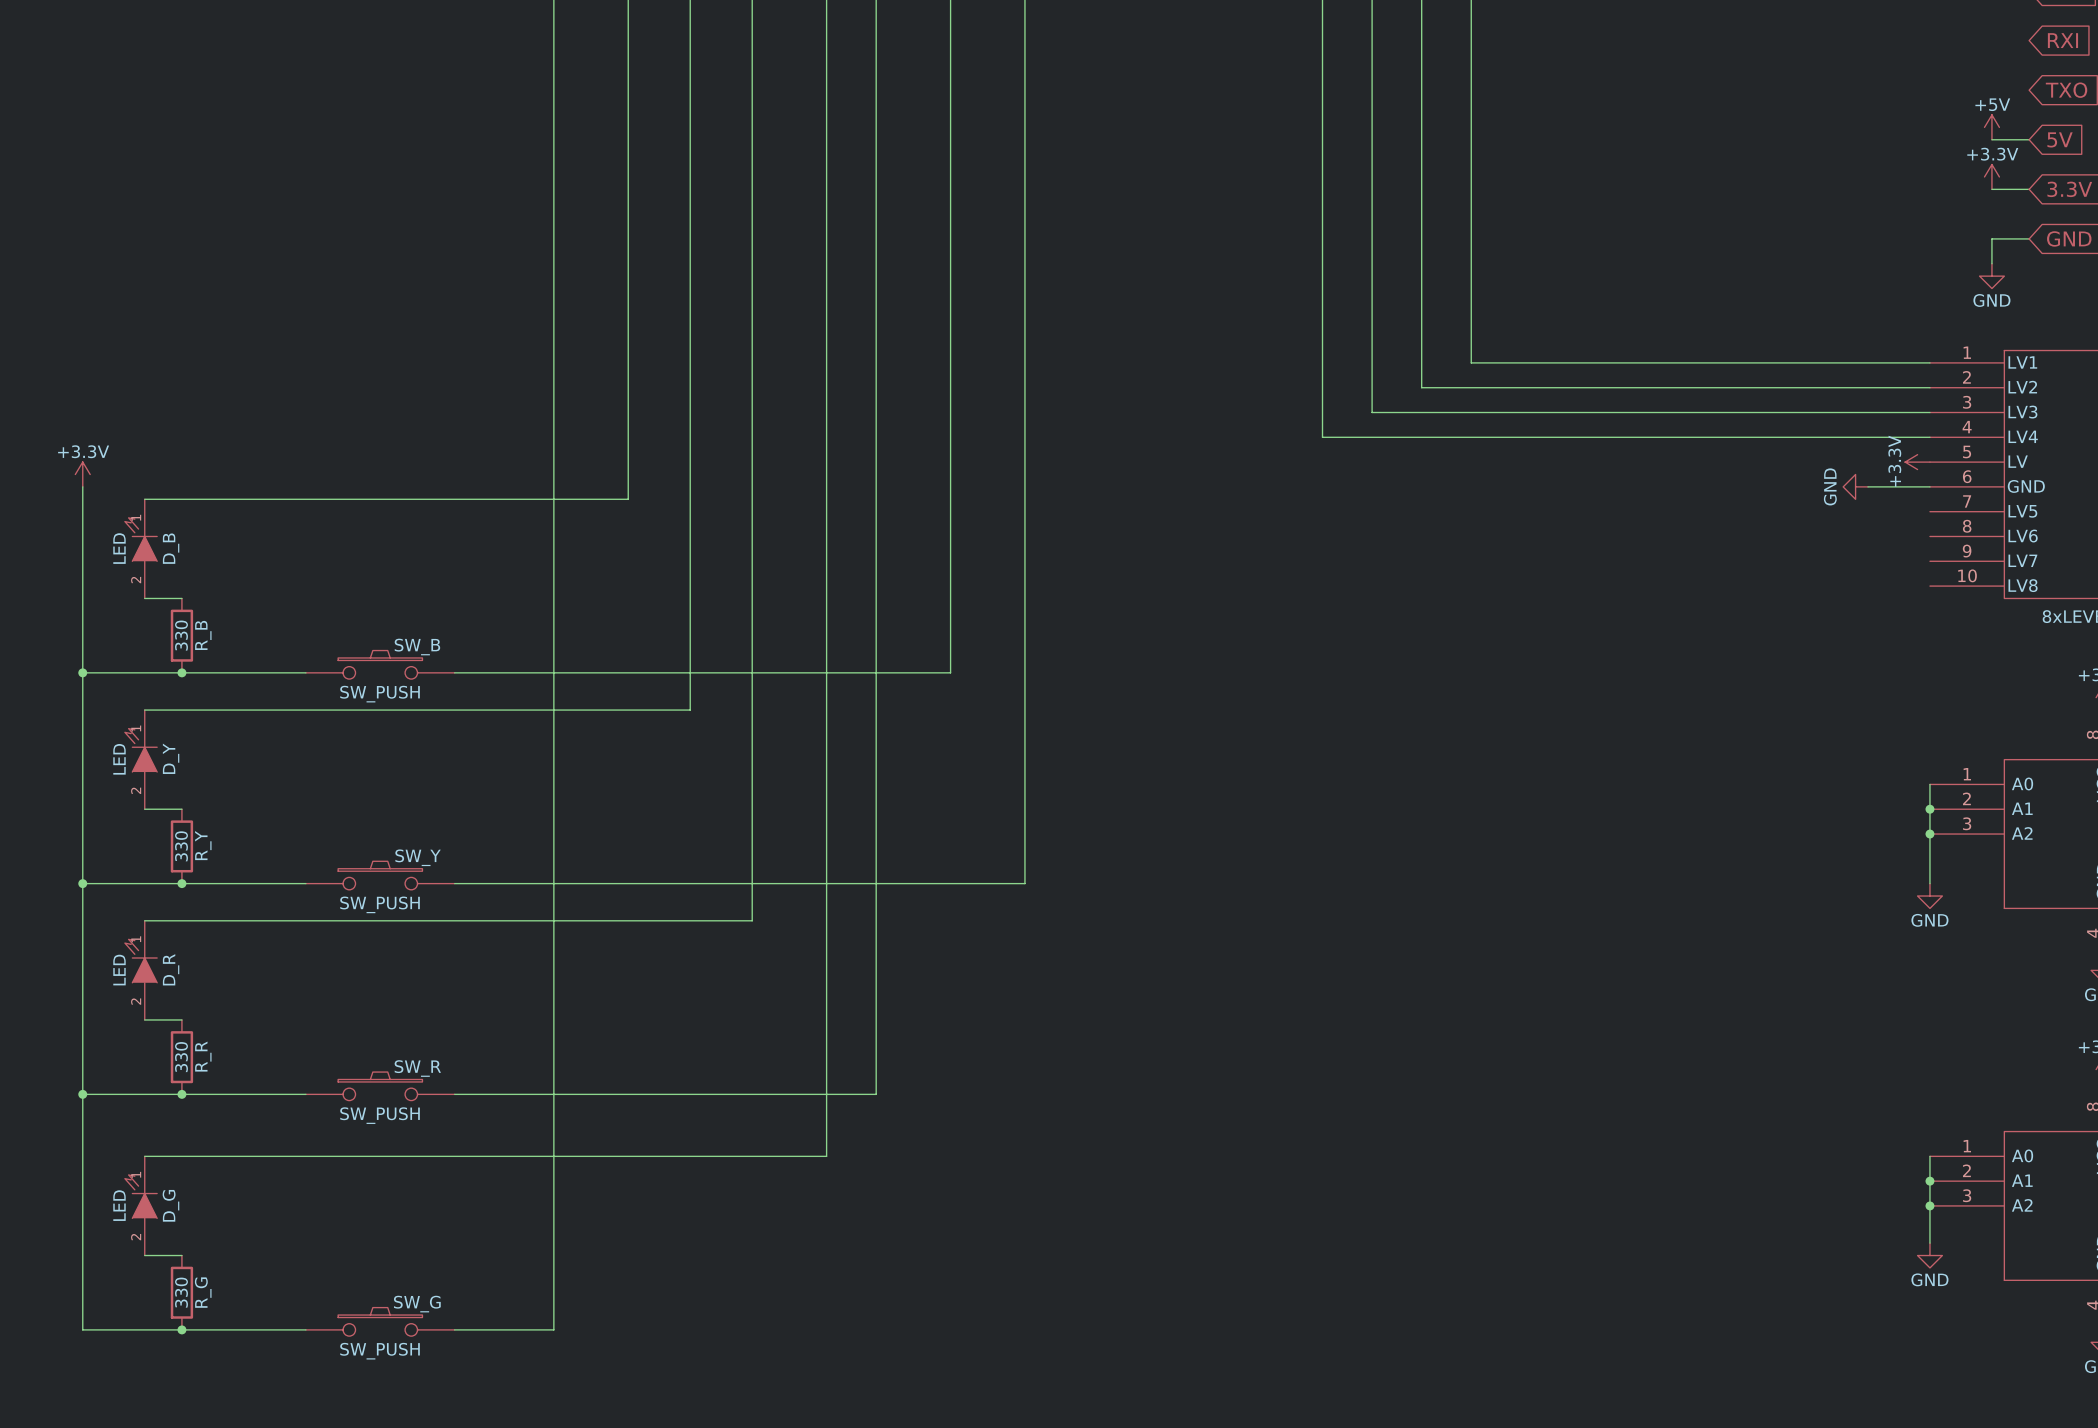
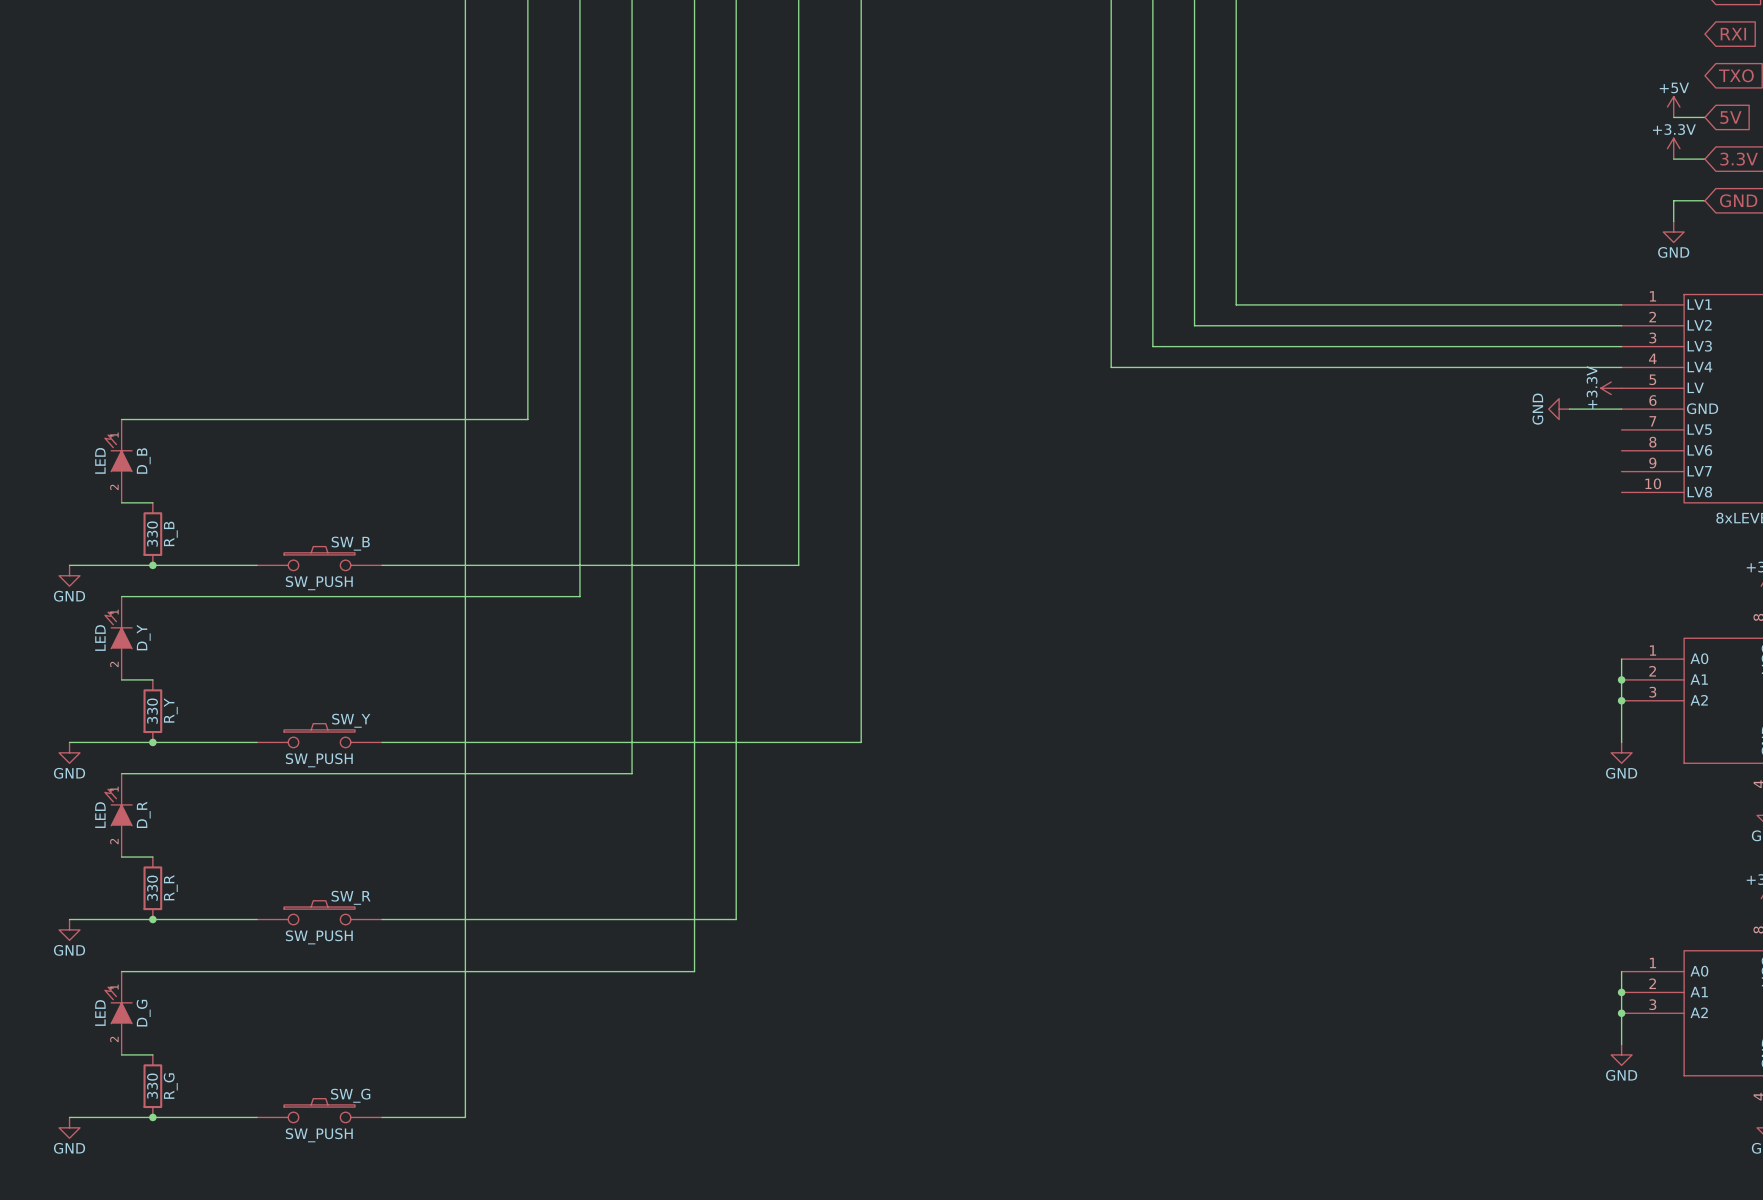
power symbol: +3.3V (82, 474) -> none
wire: (82, 486) (82, 1329) -> none
junction: (82, 672) -> none
power symbol: none -> GND (69, 575)
junction: (82, 883) -> none
power symbol: none -> GND (69, 752)
junction: (82, 1094) -> none
power symbol: none -> GND (69, 929)
power symbol: none -> GND (69, 1127)

